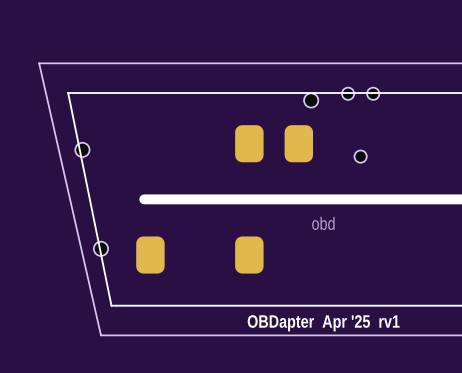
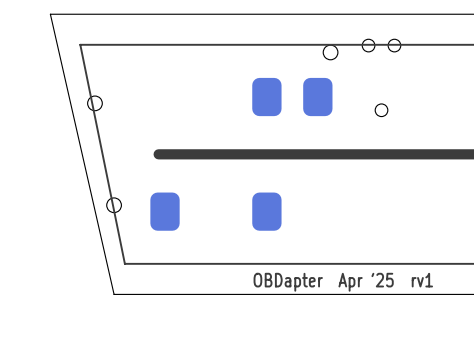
part value: obd (323, 223) -> none

